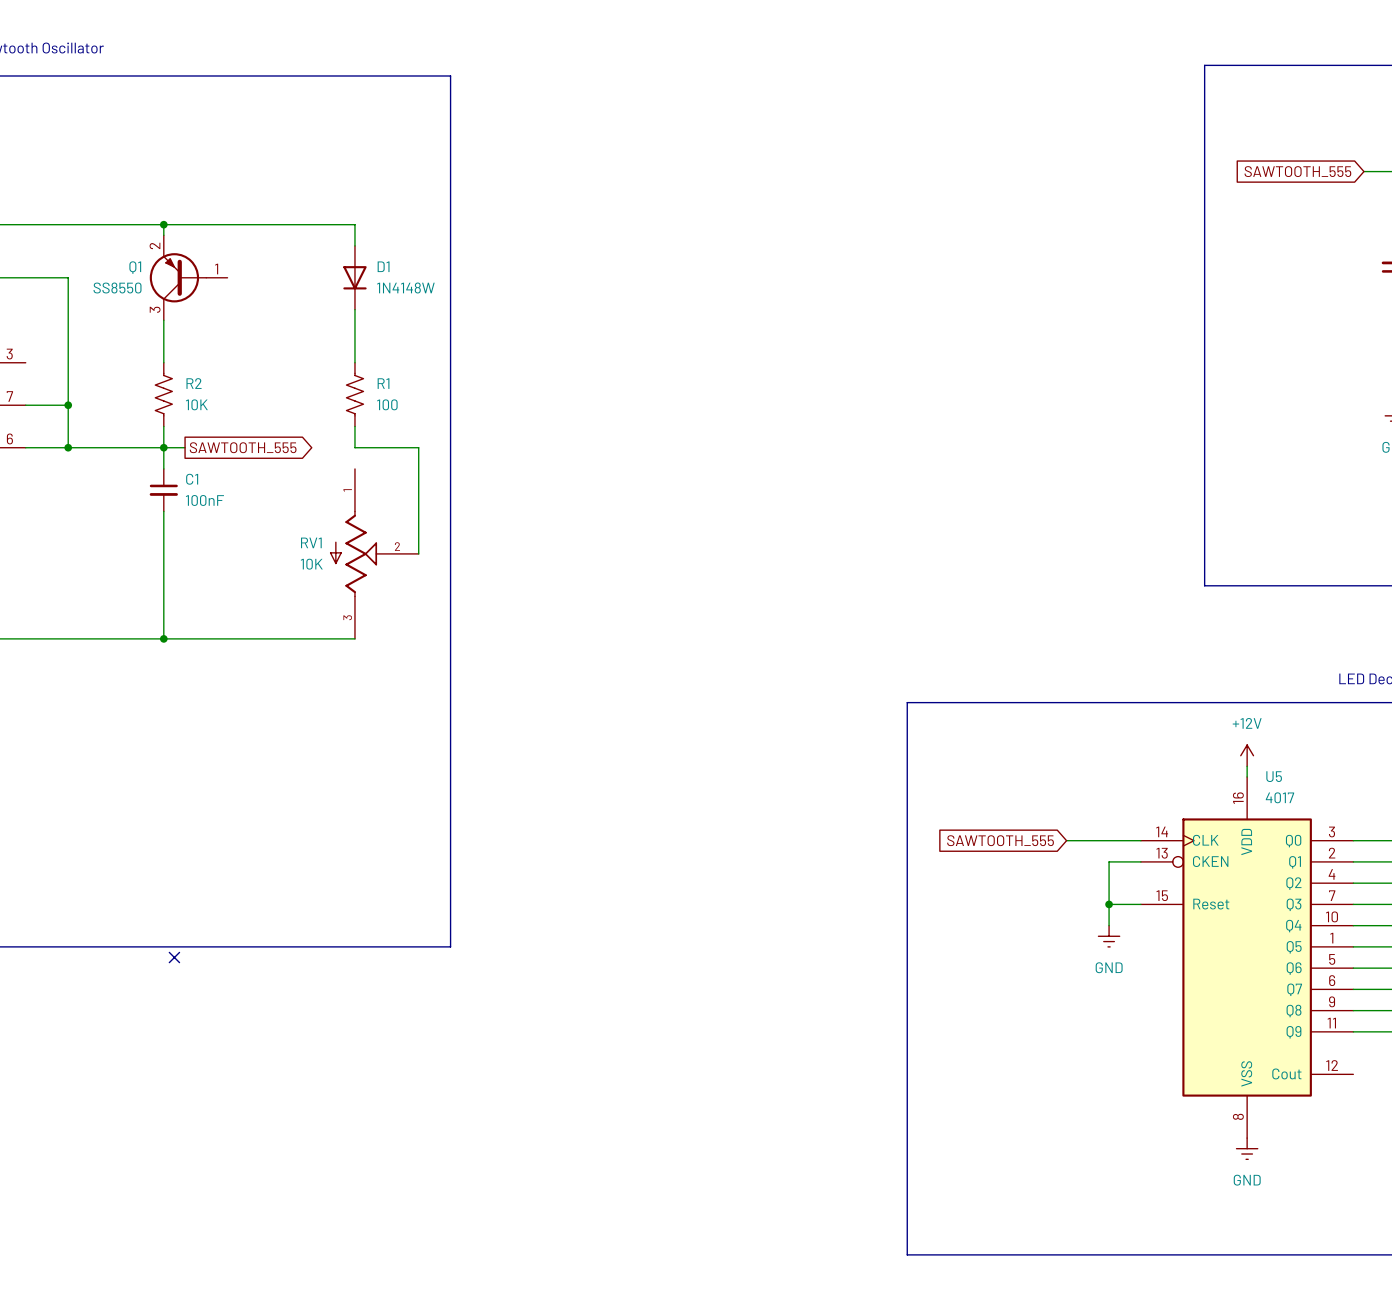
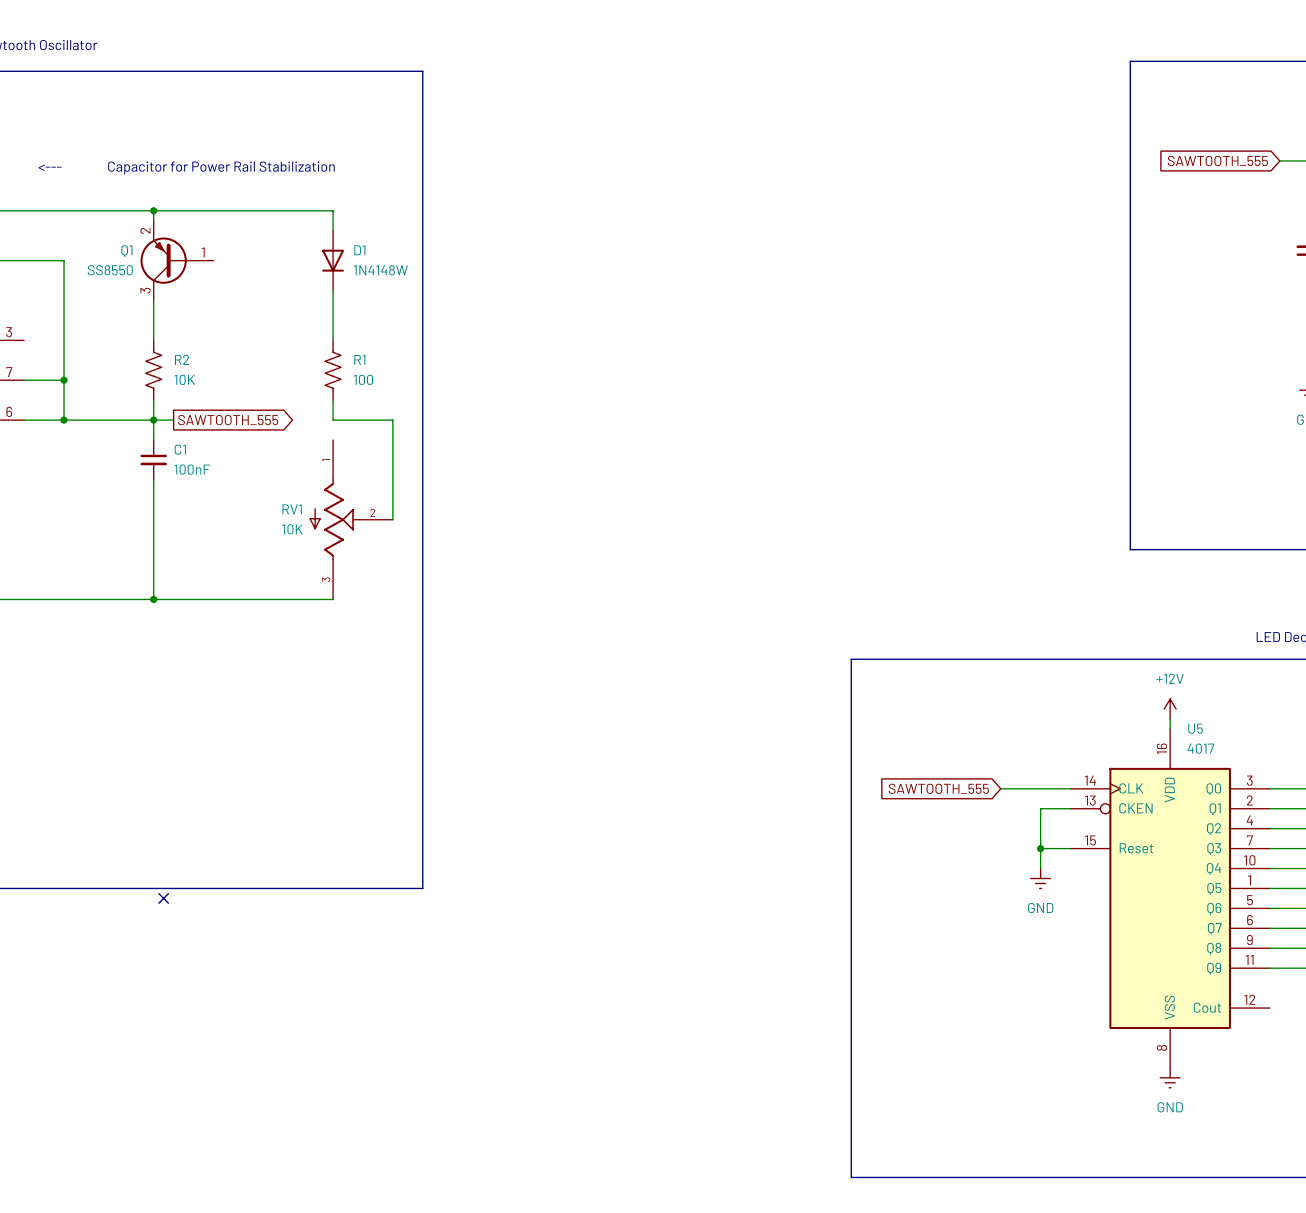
text: none -> <--- (50, 167)
text: none -> Capacitor for Power Rail Stabilization (221, 167)

